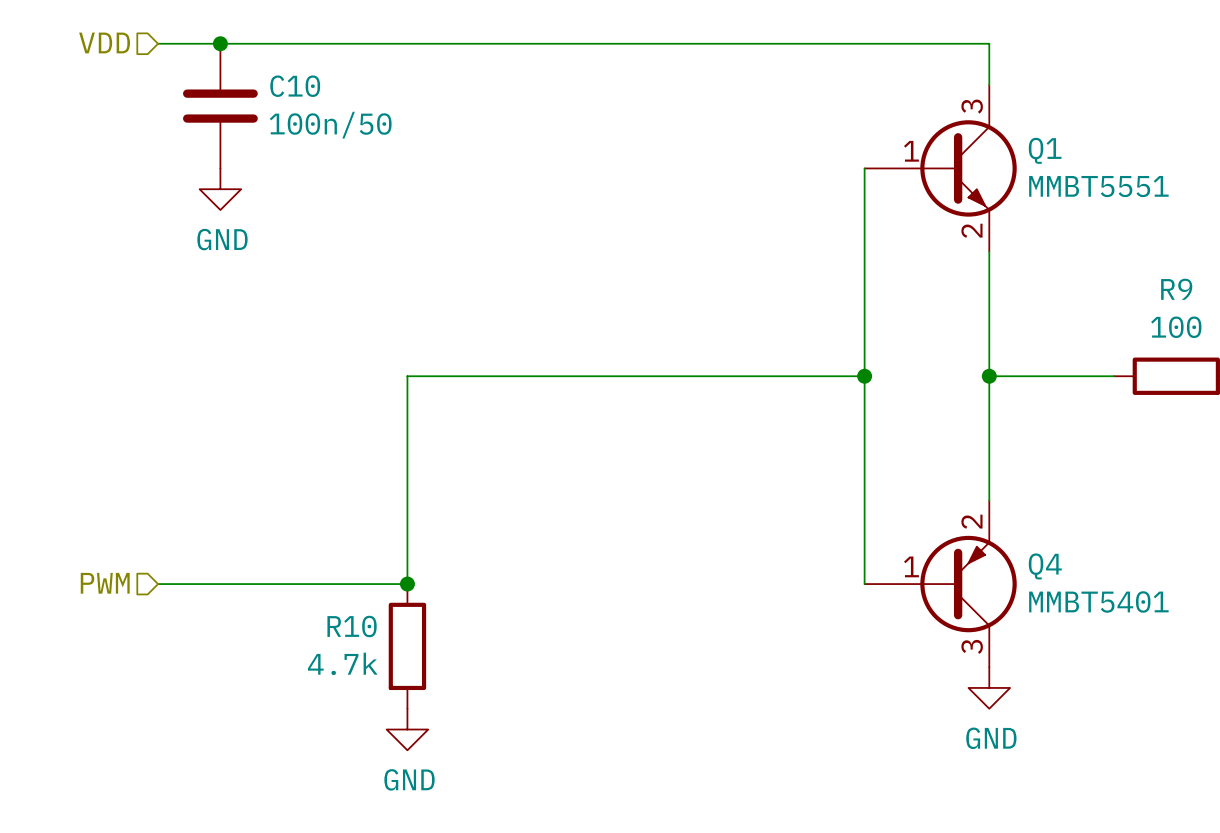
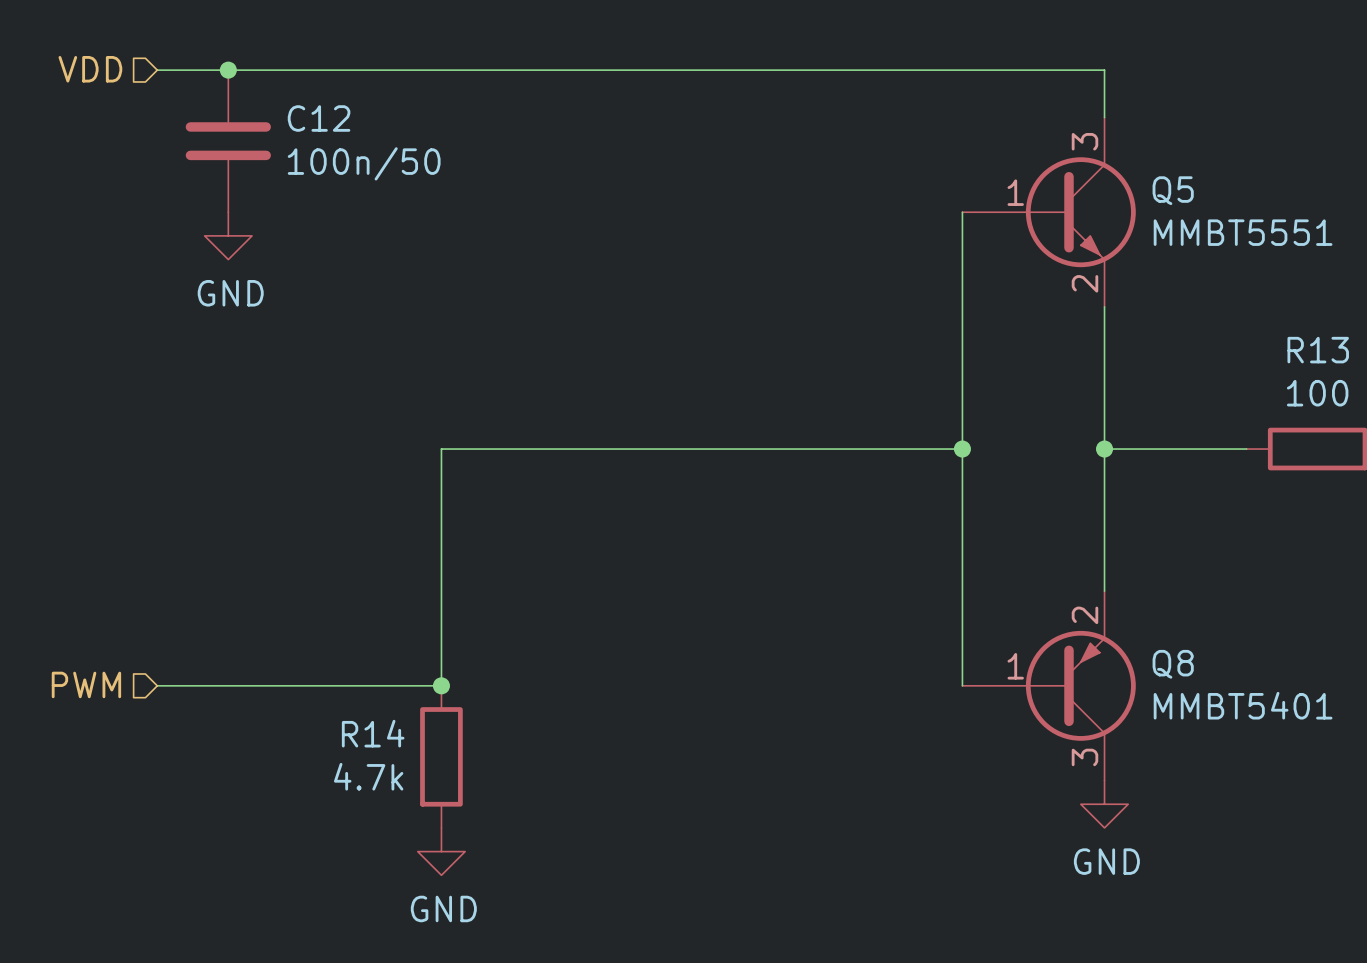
C10 name: C10 (295, 86) -> C12 (319, 118)
Q1 name: Q1 (1045, 150) -> Q5 (1173, 190)
R9 name: R9 (1176, 289) -> R13 (1318, 350)
Q4 name: Q4 (1045, 566) -> Q8 (1173, 664)
R10 name: R10 (352, 626) -> R14 (373, 733)

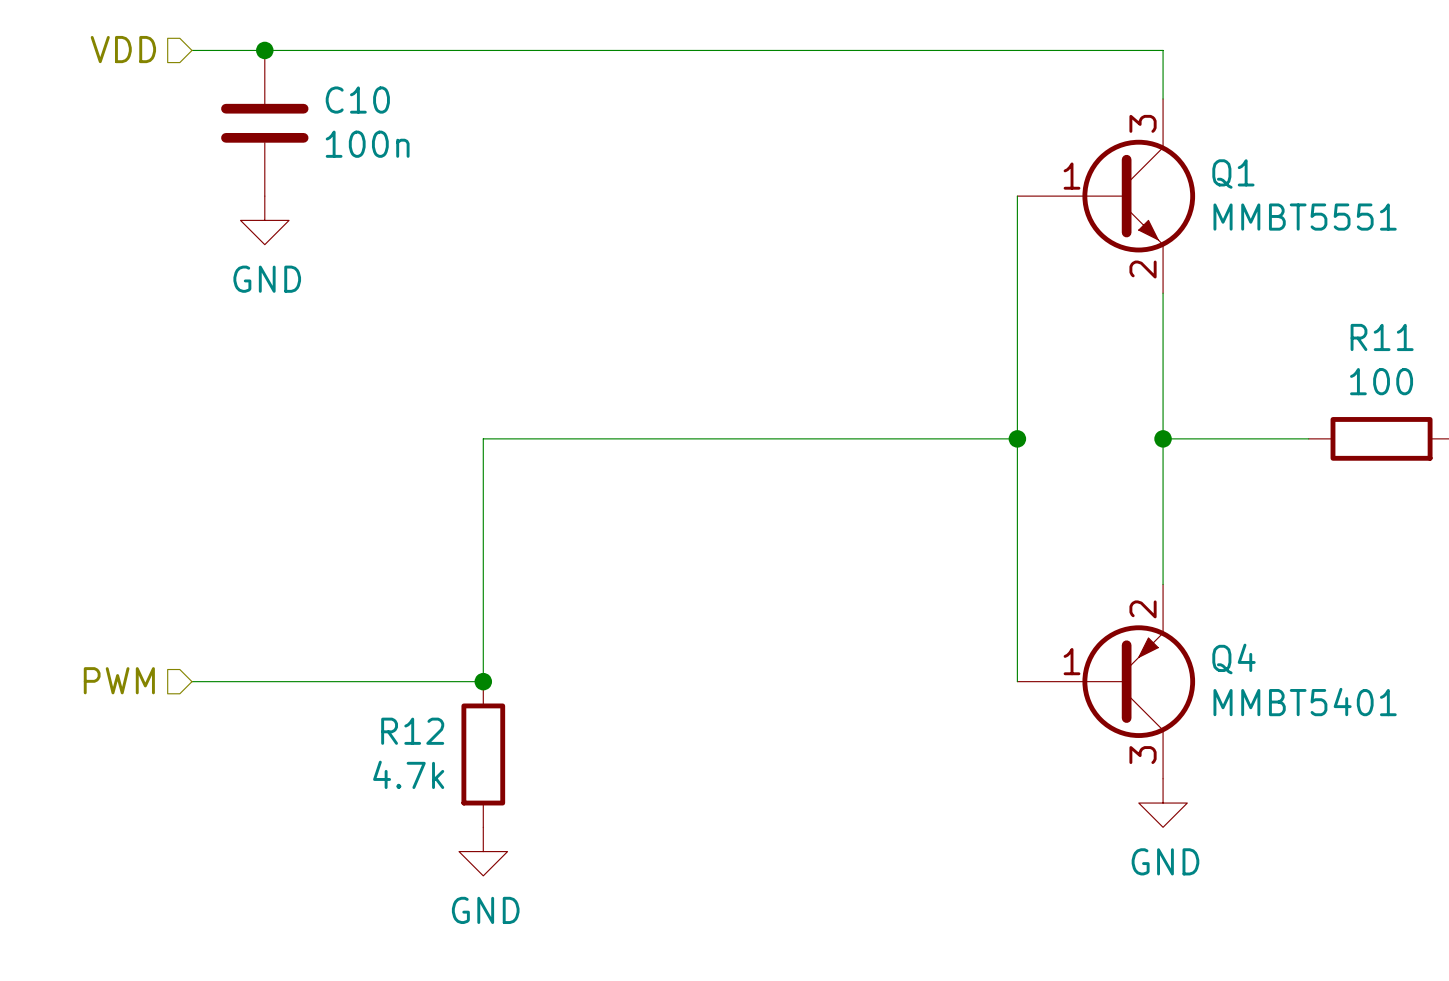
C12 name: C12 (319, 118) -> C10 (357, 100)
C12 value: 100n/50 (364, 163) -> 100n (367, 144)
Q5 name: Q5 (1173, 190) -> Q1 (1233, 174)
R13 name: R13 (1318, 350) -> R11 (1382, 337)
Q8 name: Q8 (1173, 664) -> Q4 (1234, 658)
R14 name: R14 (373, 733) -> R12 (412, 731)

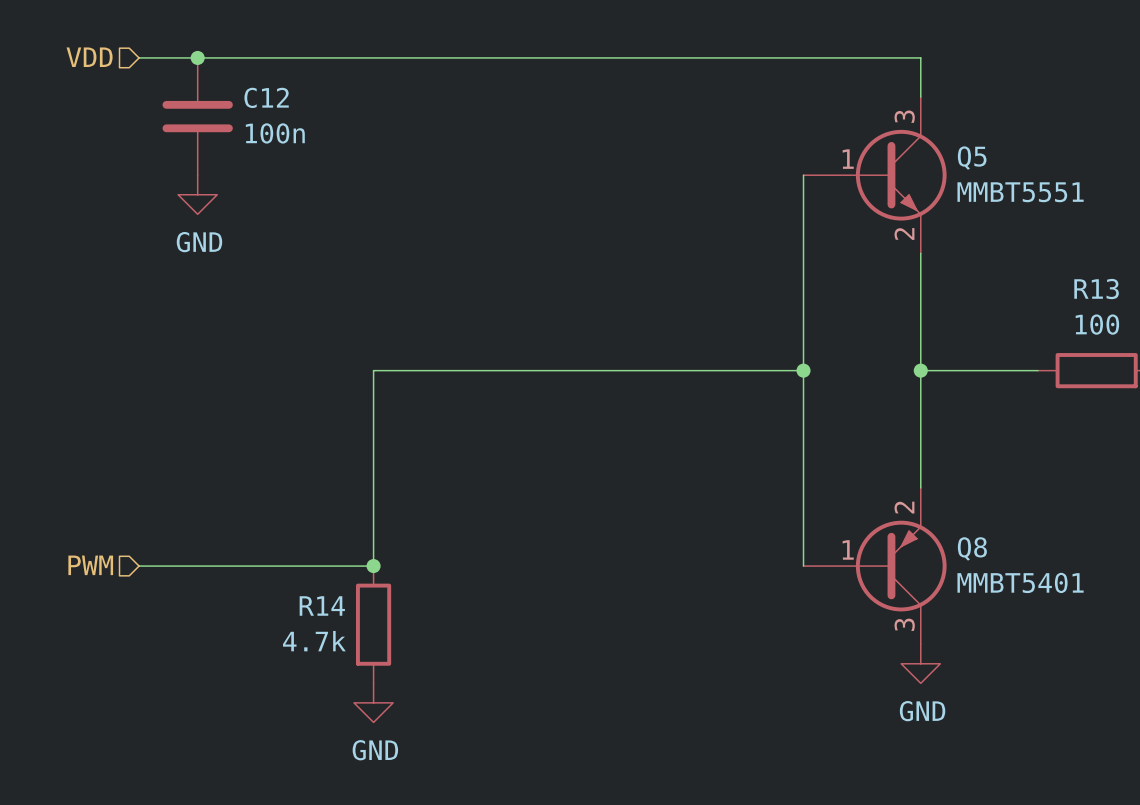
C10 name: C10 (357, 100) -> C12 (266, 97)
Q1 name: Q1 (1233, 174) -> Q5 (972, 158)
R11 name: R11 (1382, 337) -> R13 (1096, 289)
Q4 name: Q4 (1234, 658) -> Q8 (972, 548)
R12 name: R12 (412, 731) -> R14 (322, 605)

